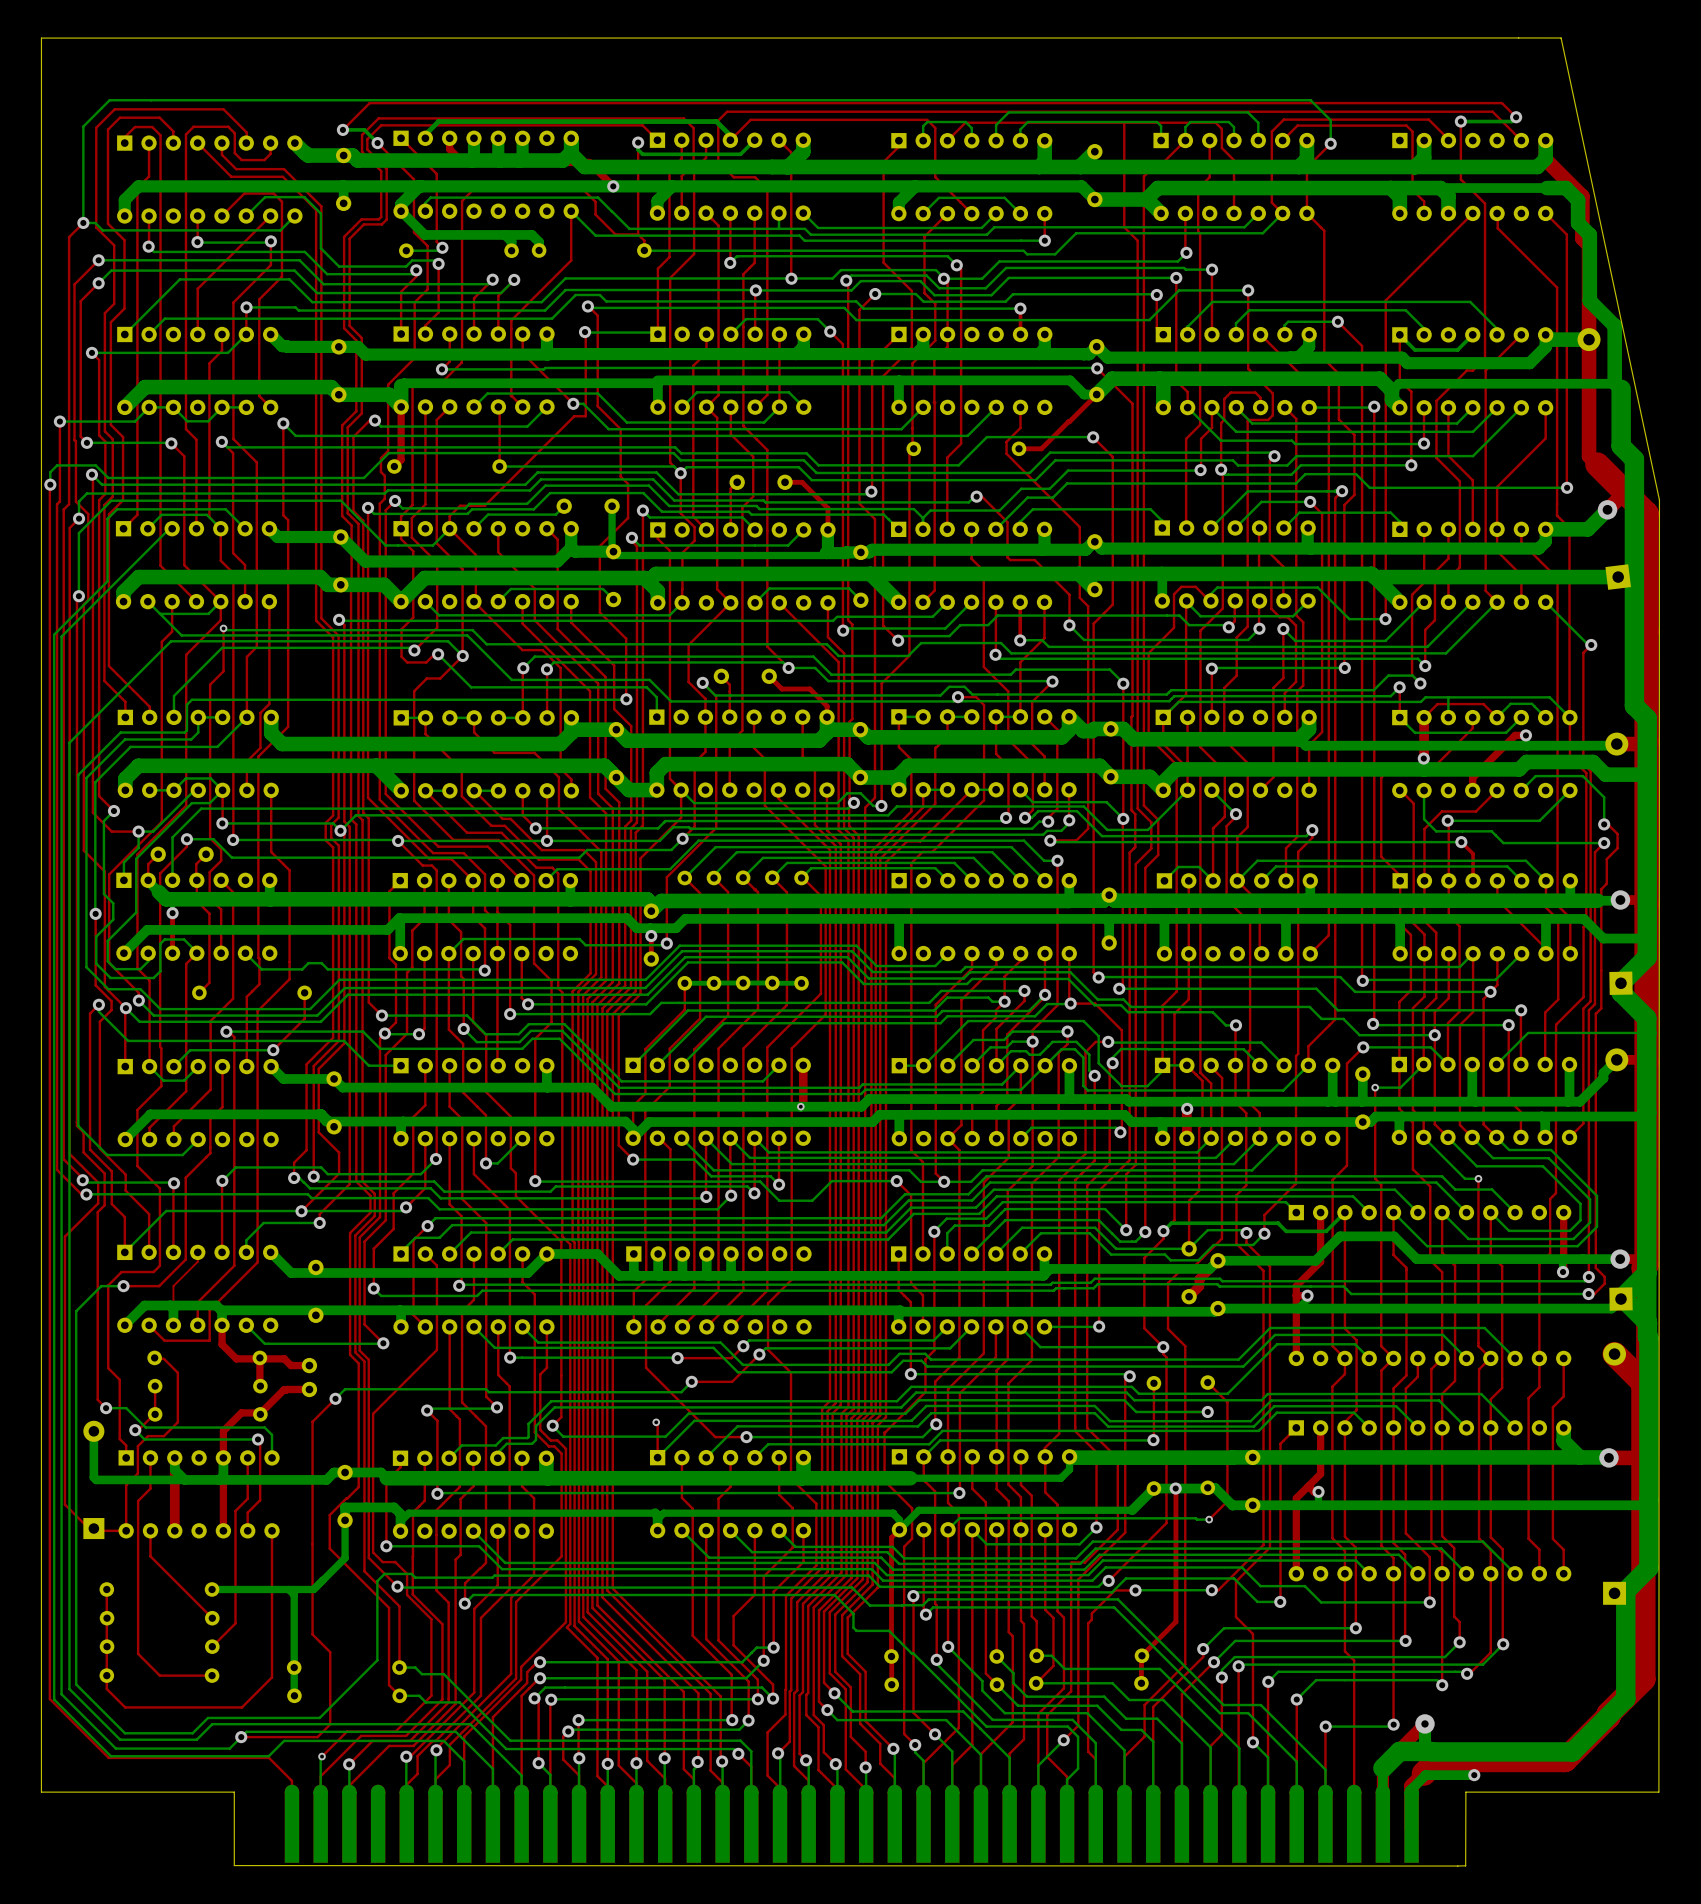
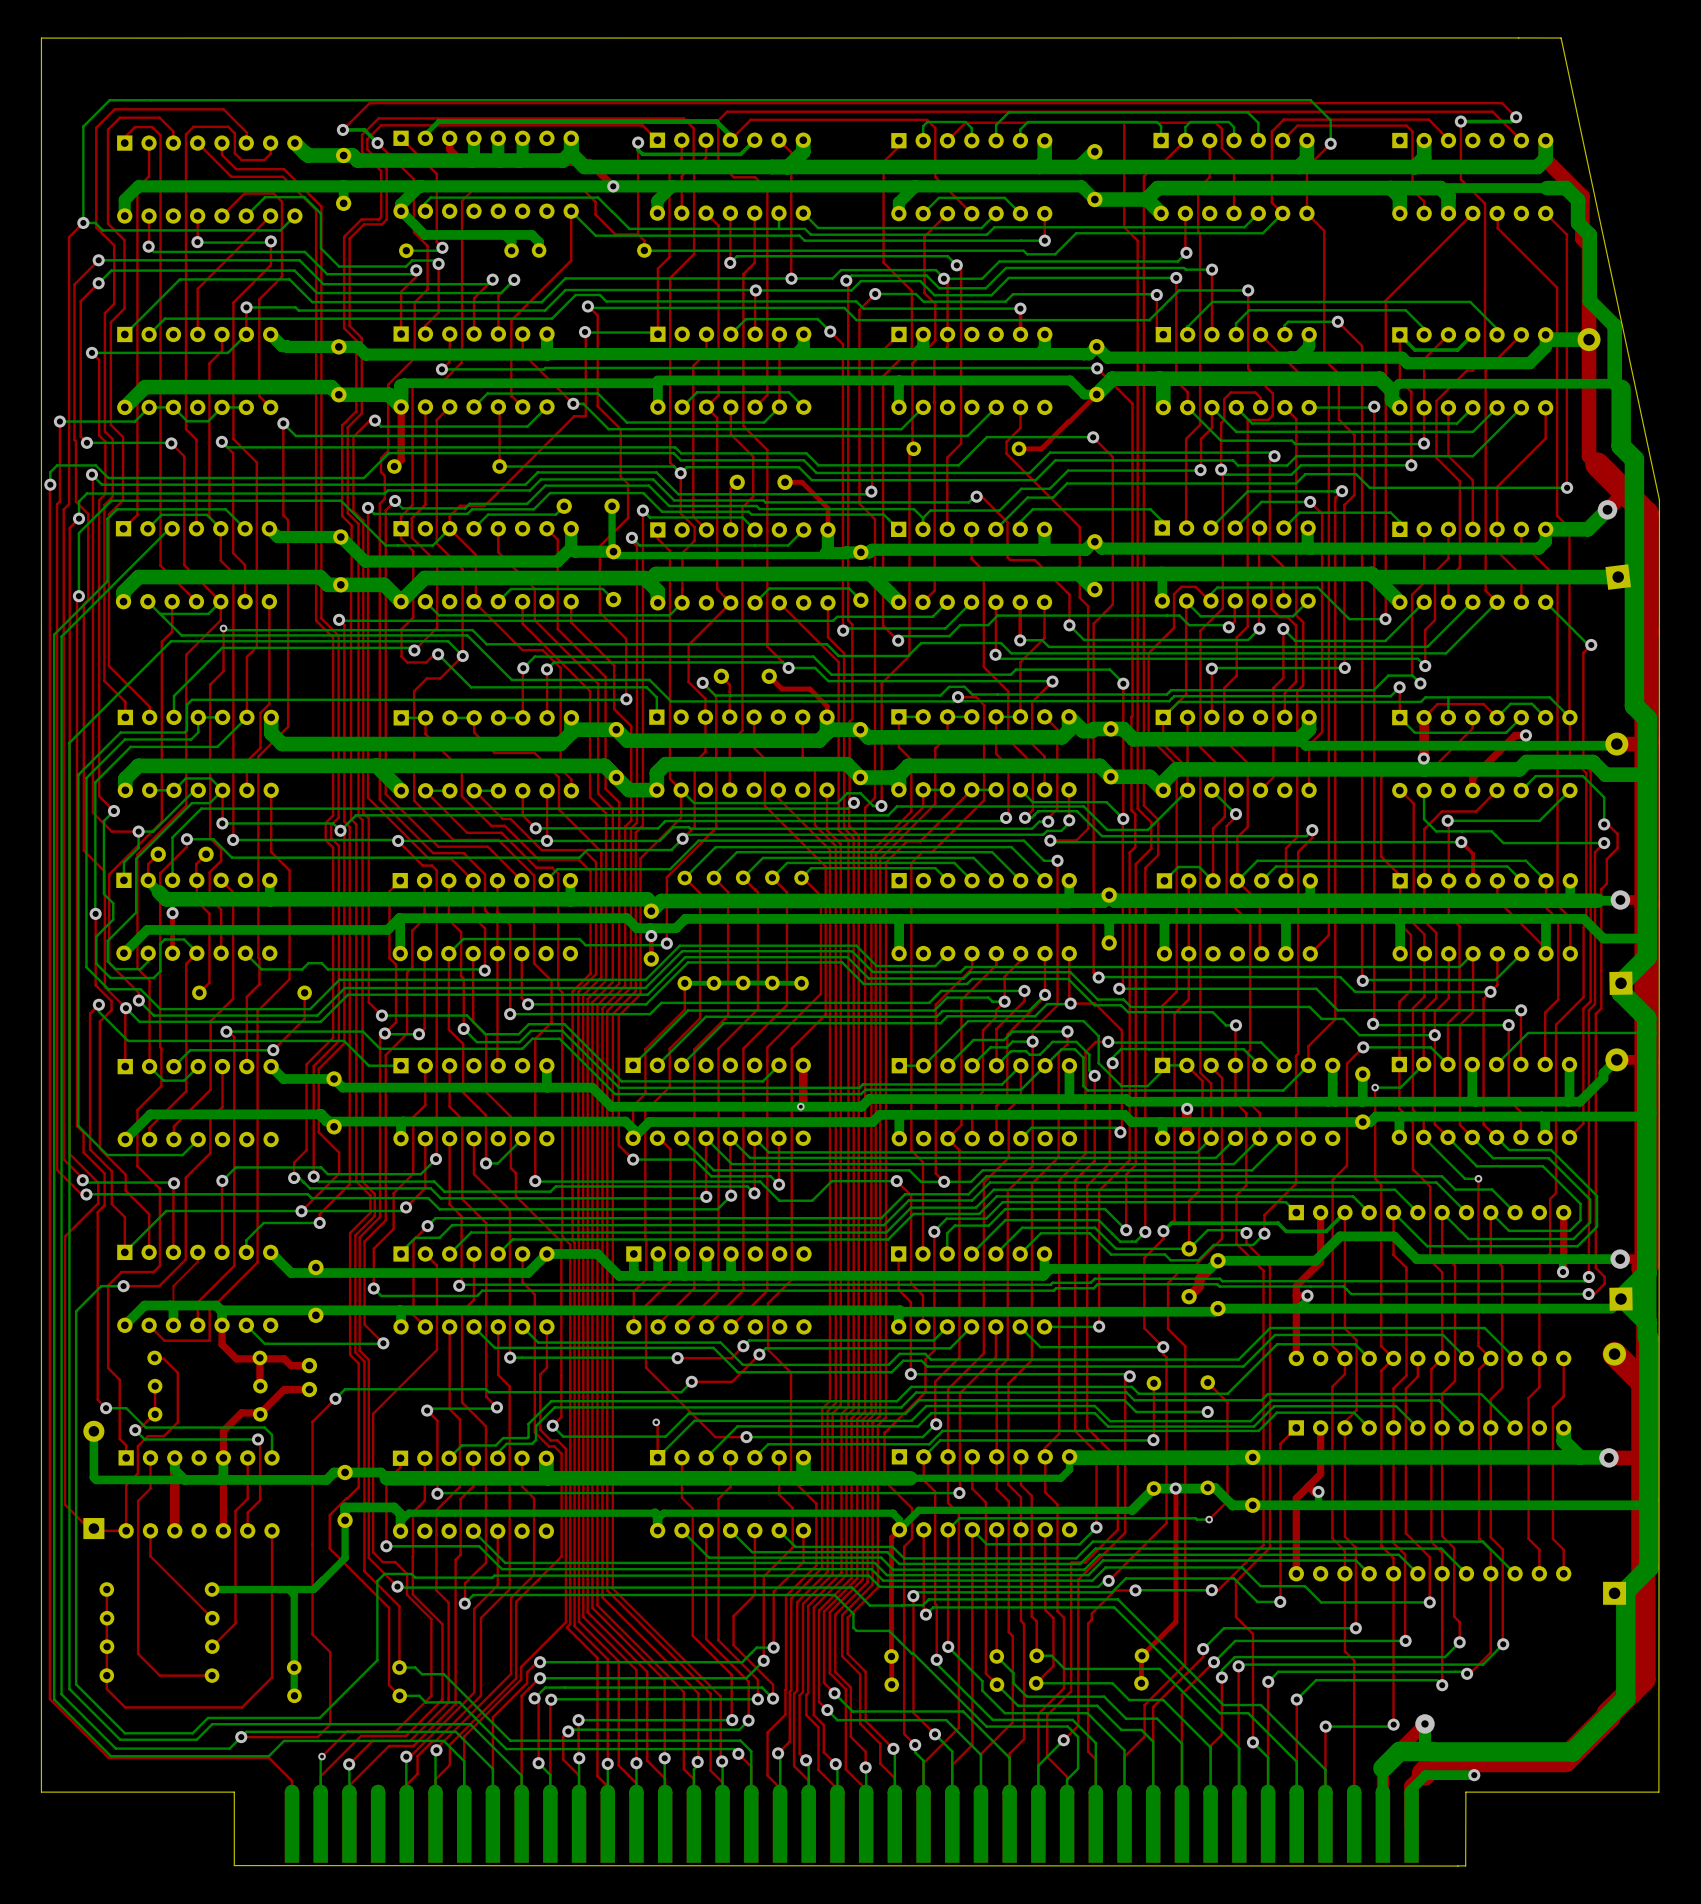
top track: none -> (1448, 334) (1424, 359) (1424, 407)

